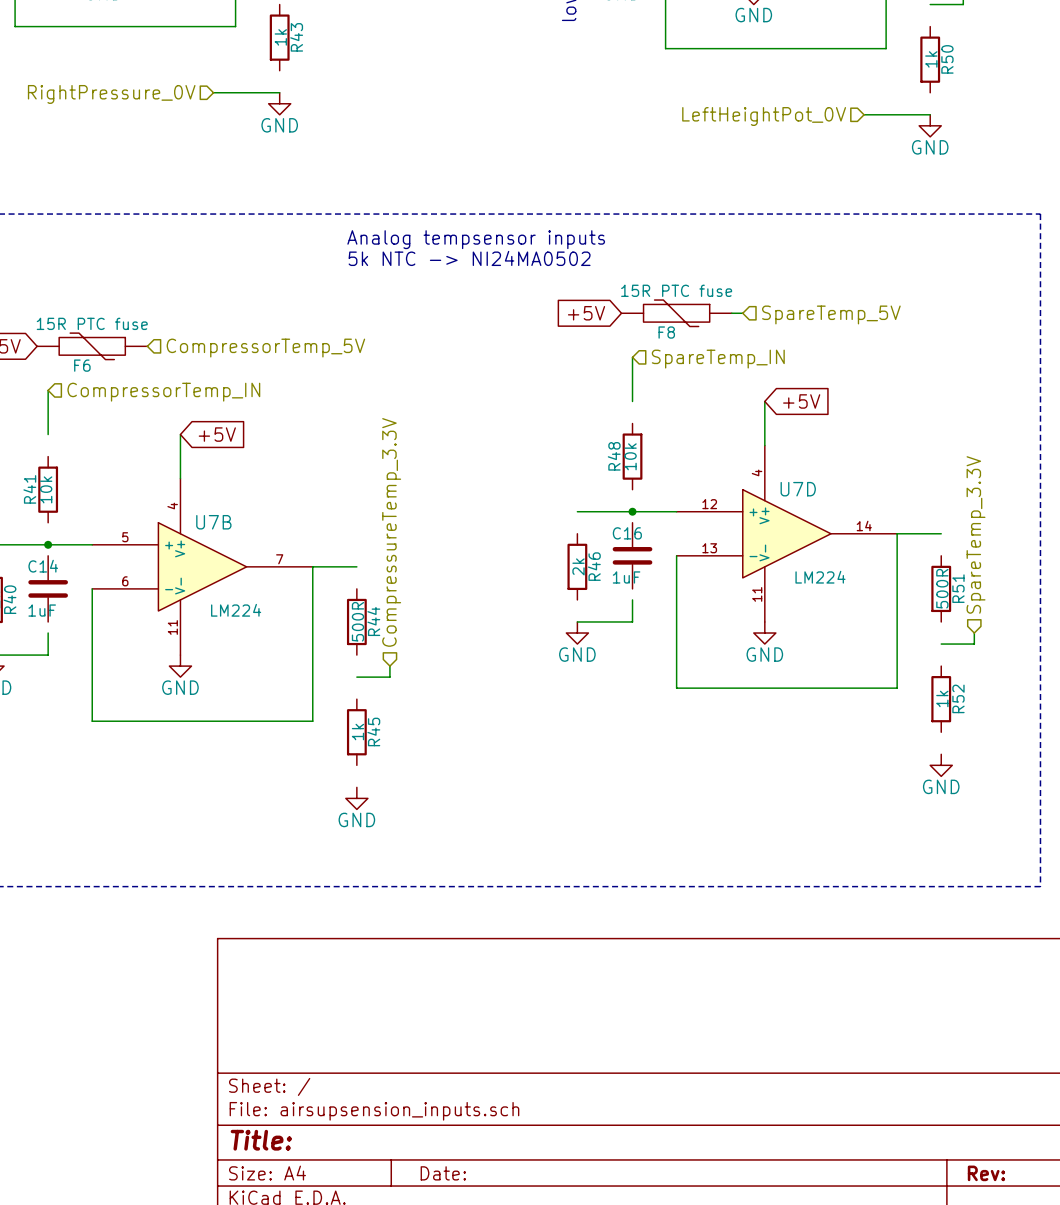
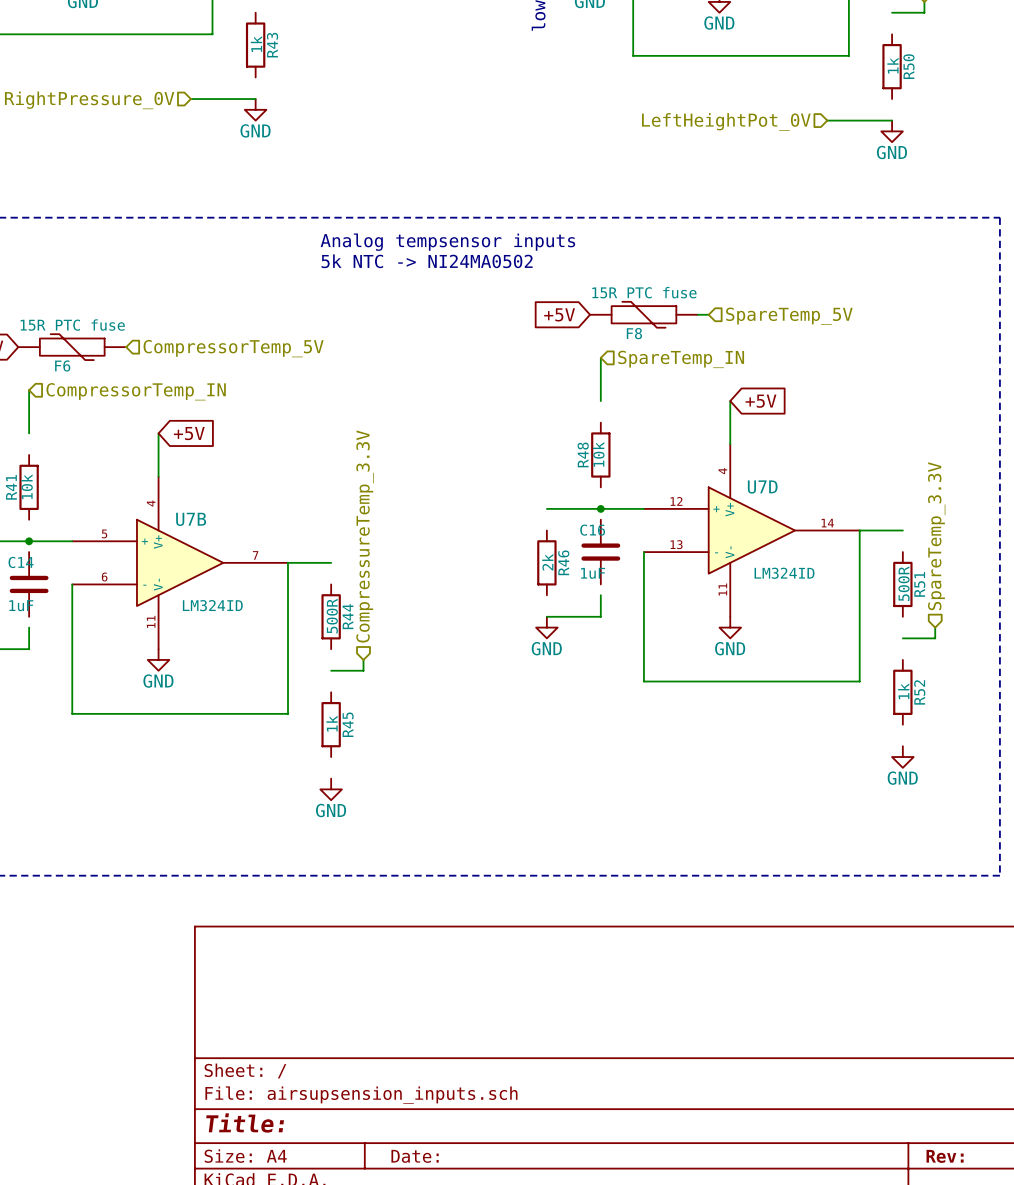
U7D value: LM224 (820, 577) -> LM324ID (784, 573)
U7B value: LM224 (236, 610) -> LM324ID (212, 605)

